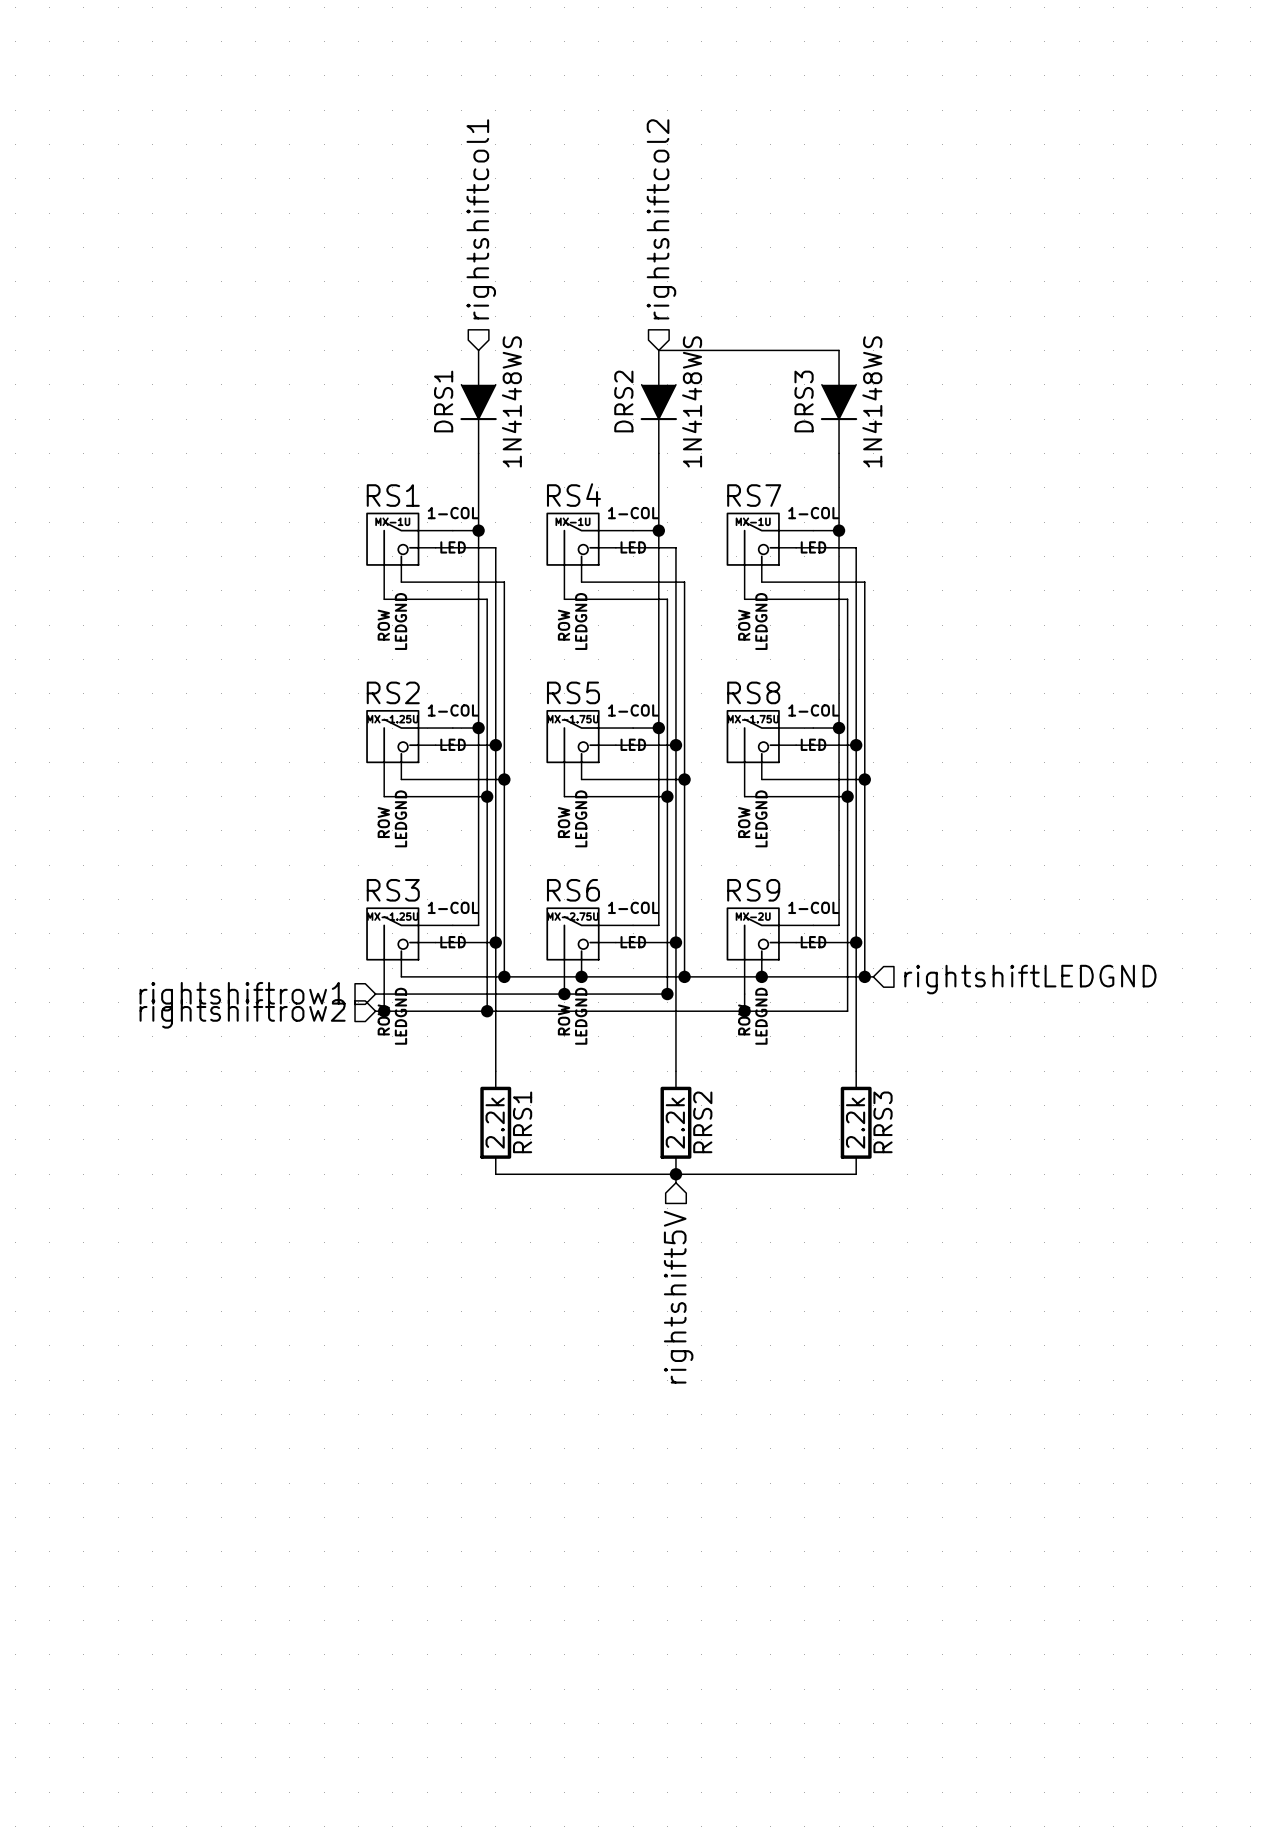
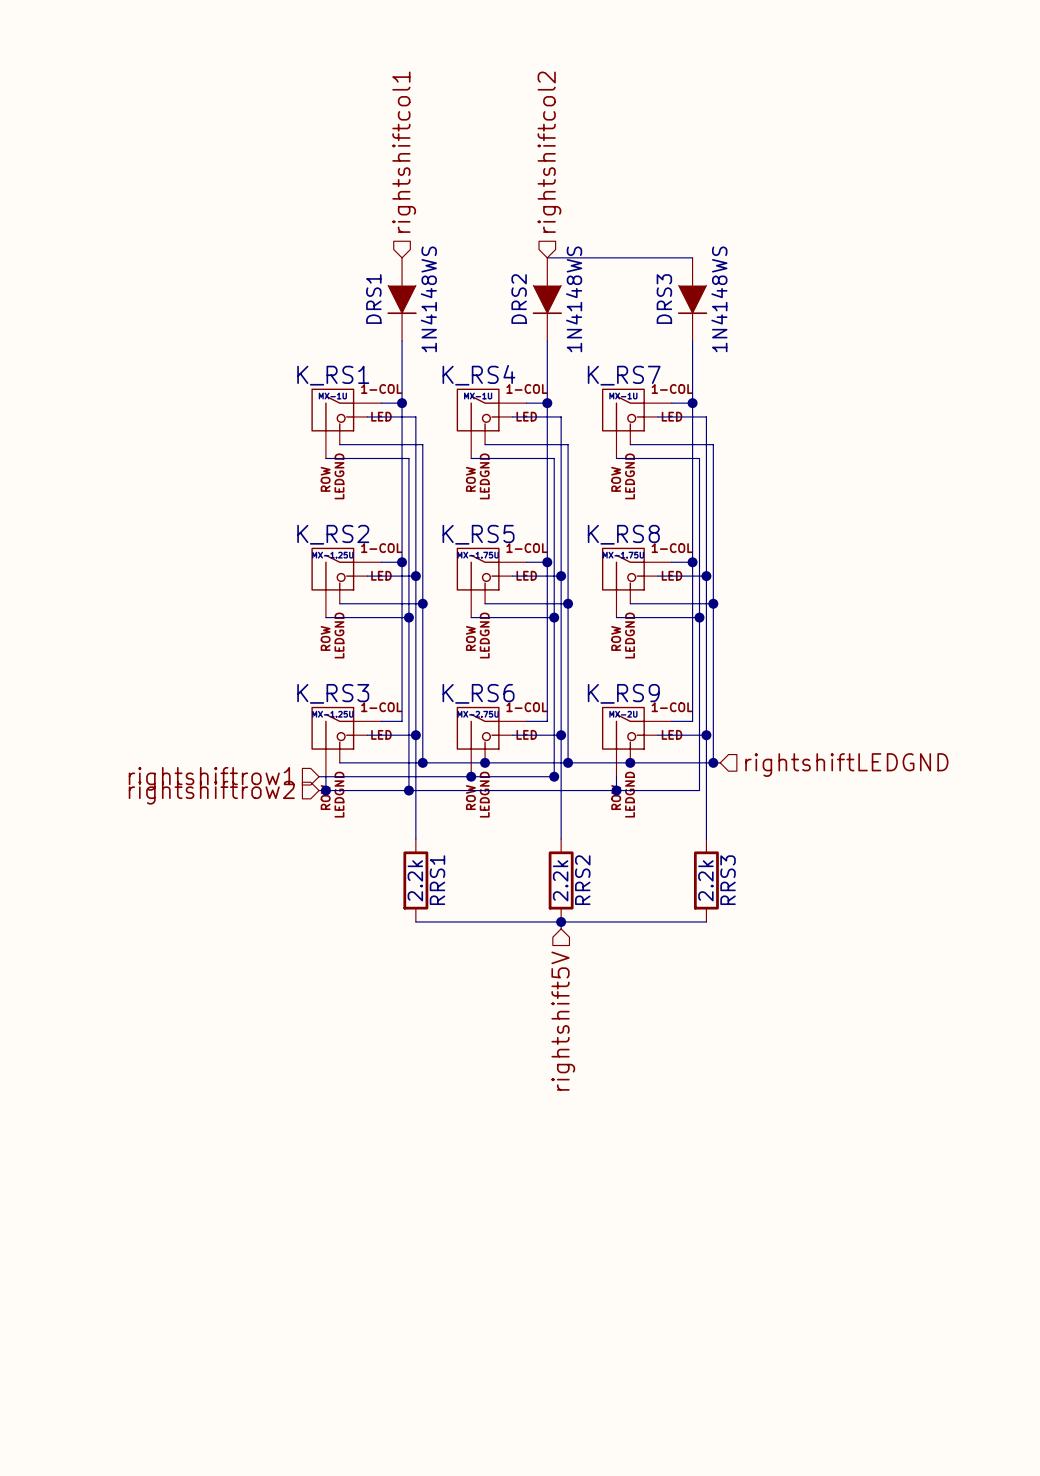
RS1 name: RS1 (393, 495) -> K_RS1 (333, 375)
RS4 name: RS4 (573, 495) -> K_RS4 (478, 375)
RS7 name: RS7 (754, 495) -> K_RS7 (624, 375)
RS2 name: RS2 (393, 692) -> K_RS2 (333, 534)
RS5 name: RS5 (573, 692) -> K_RS5 (478, 534)
RS8 name: RS8 (753, 692) -> K_RS8 (623, 534)
RS3 name: RS3 (393, 890) -> K_RS3 (333, 693)
RS6 name: RS6 (573, 890) -> K_RS6 (478, 693)
RS9 name: RS9 (753, 890) -> K_RS9 (623, 693)

